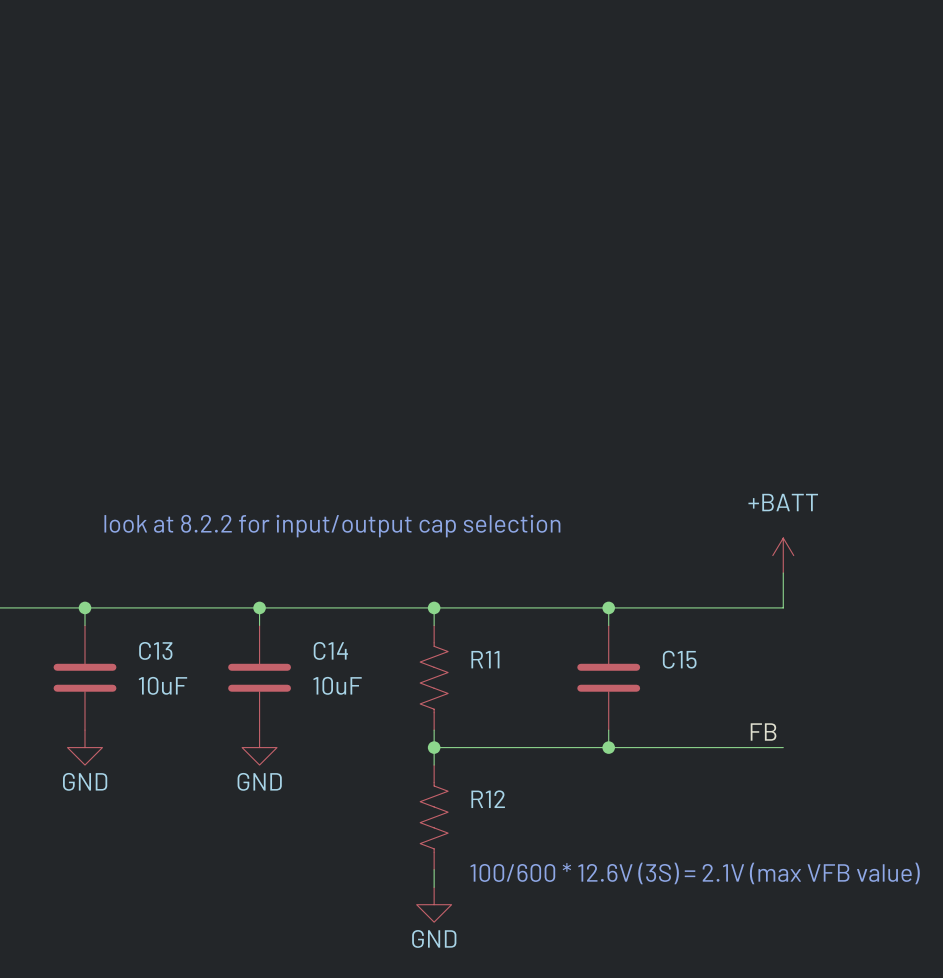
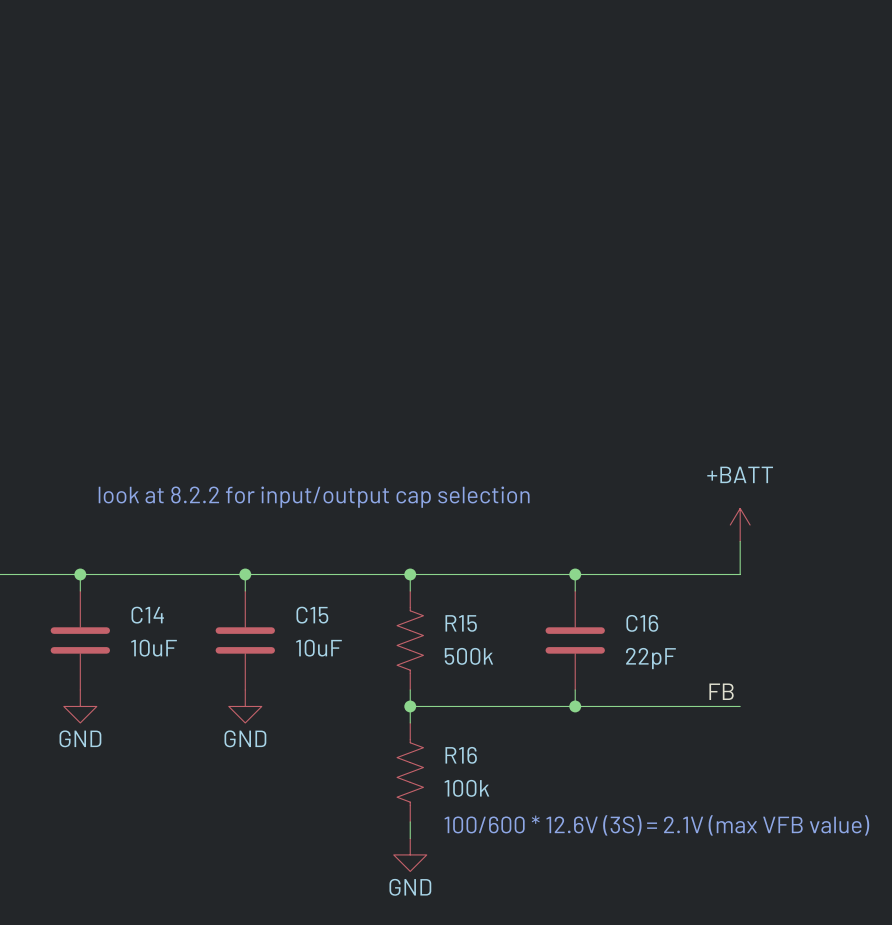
C13 name: C13 (155, 650) -> C14 (147, 615)
C14 name: C14 (330, 650) -> C15 (312, 615)
R11 name: R11 (485, 659) -> R15 (461, 623)
C15 name: C15 (679, 659) -> C16 (642, 623)
R11 value: none -> 500k (468, 656)
C15 value: none -> 22pF (650, 658)
R12 name: R12 (488, 799) -> R16 (461, 755)
R12 value: none -> 100k (466, 788)

